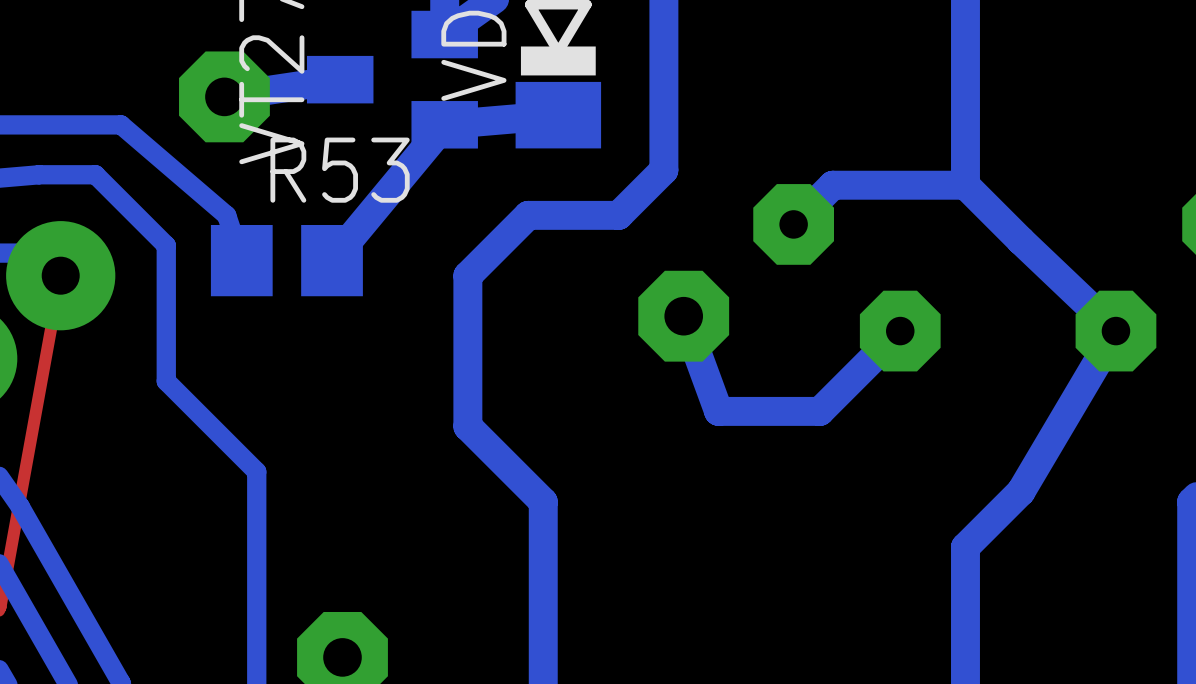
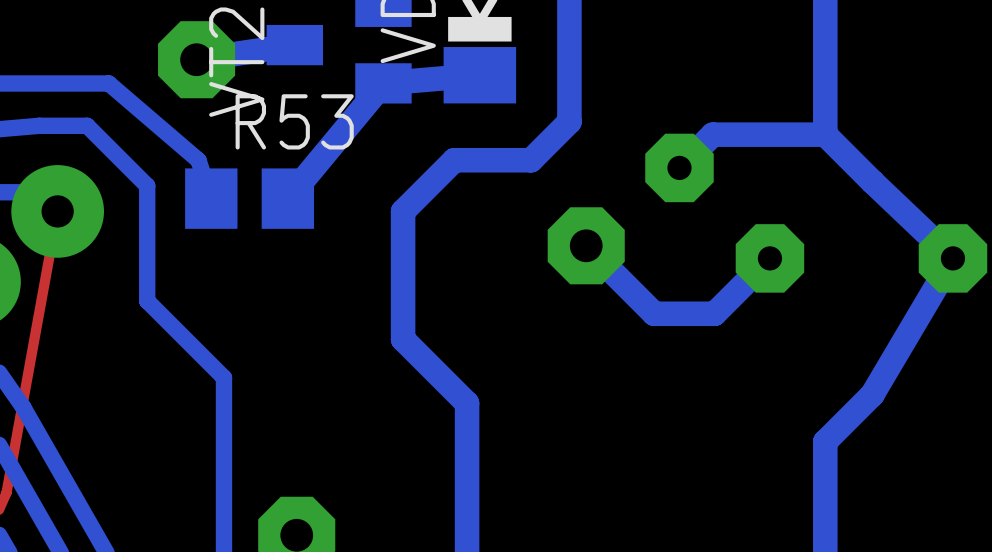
bottom track: (683, 316) (718, 411) (819, 411) (834, 396) -> (586, 245) (654, 313) (714, 313)

